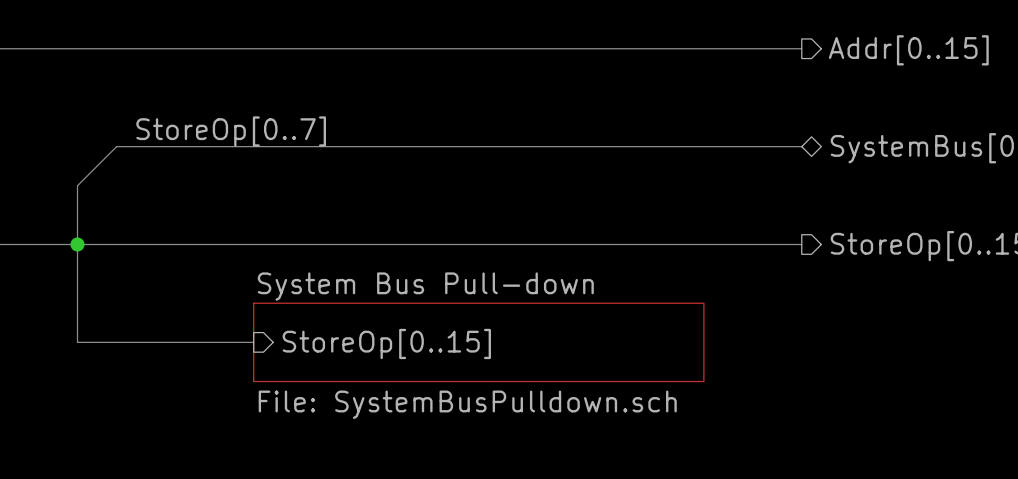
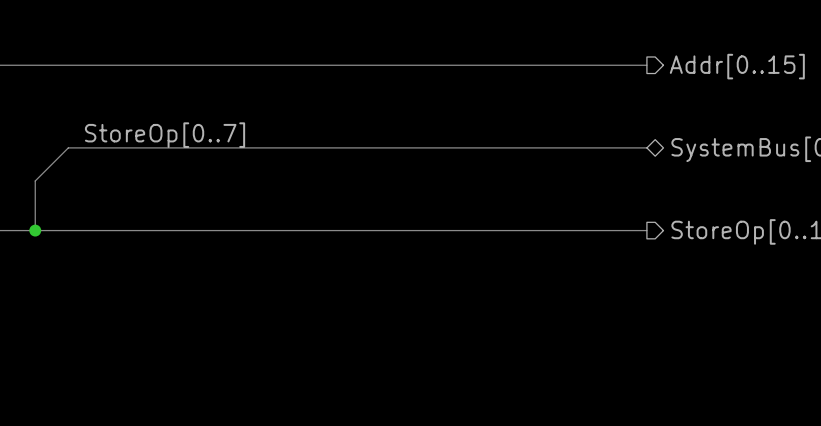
bus: (77, 244) (77, 342) (253, 342) -> none
sheet System Bus Pull-down: File: SystemBusPulldown.sch (478, 342) -> none
sheet pin: StoreOp[0..15] (386, 343) -> none

